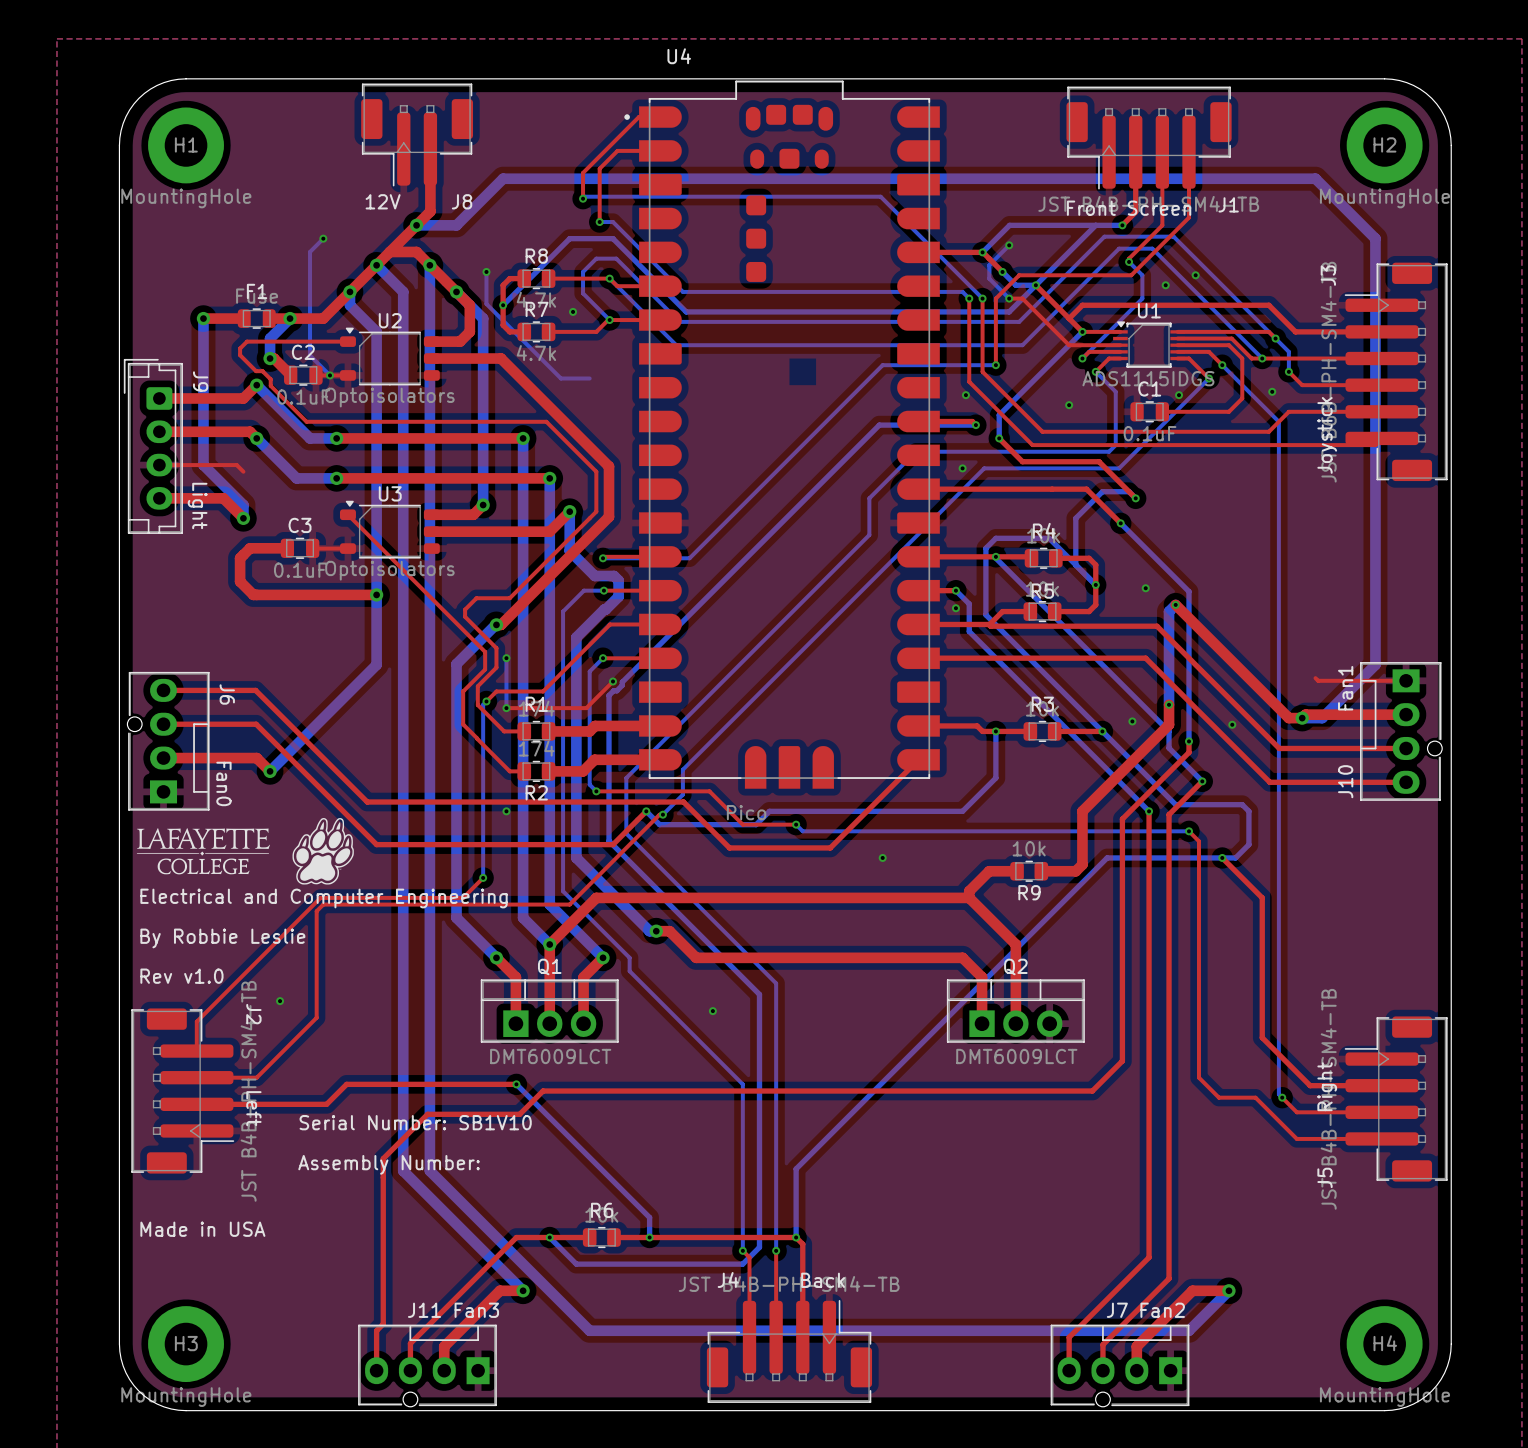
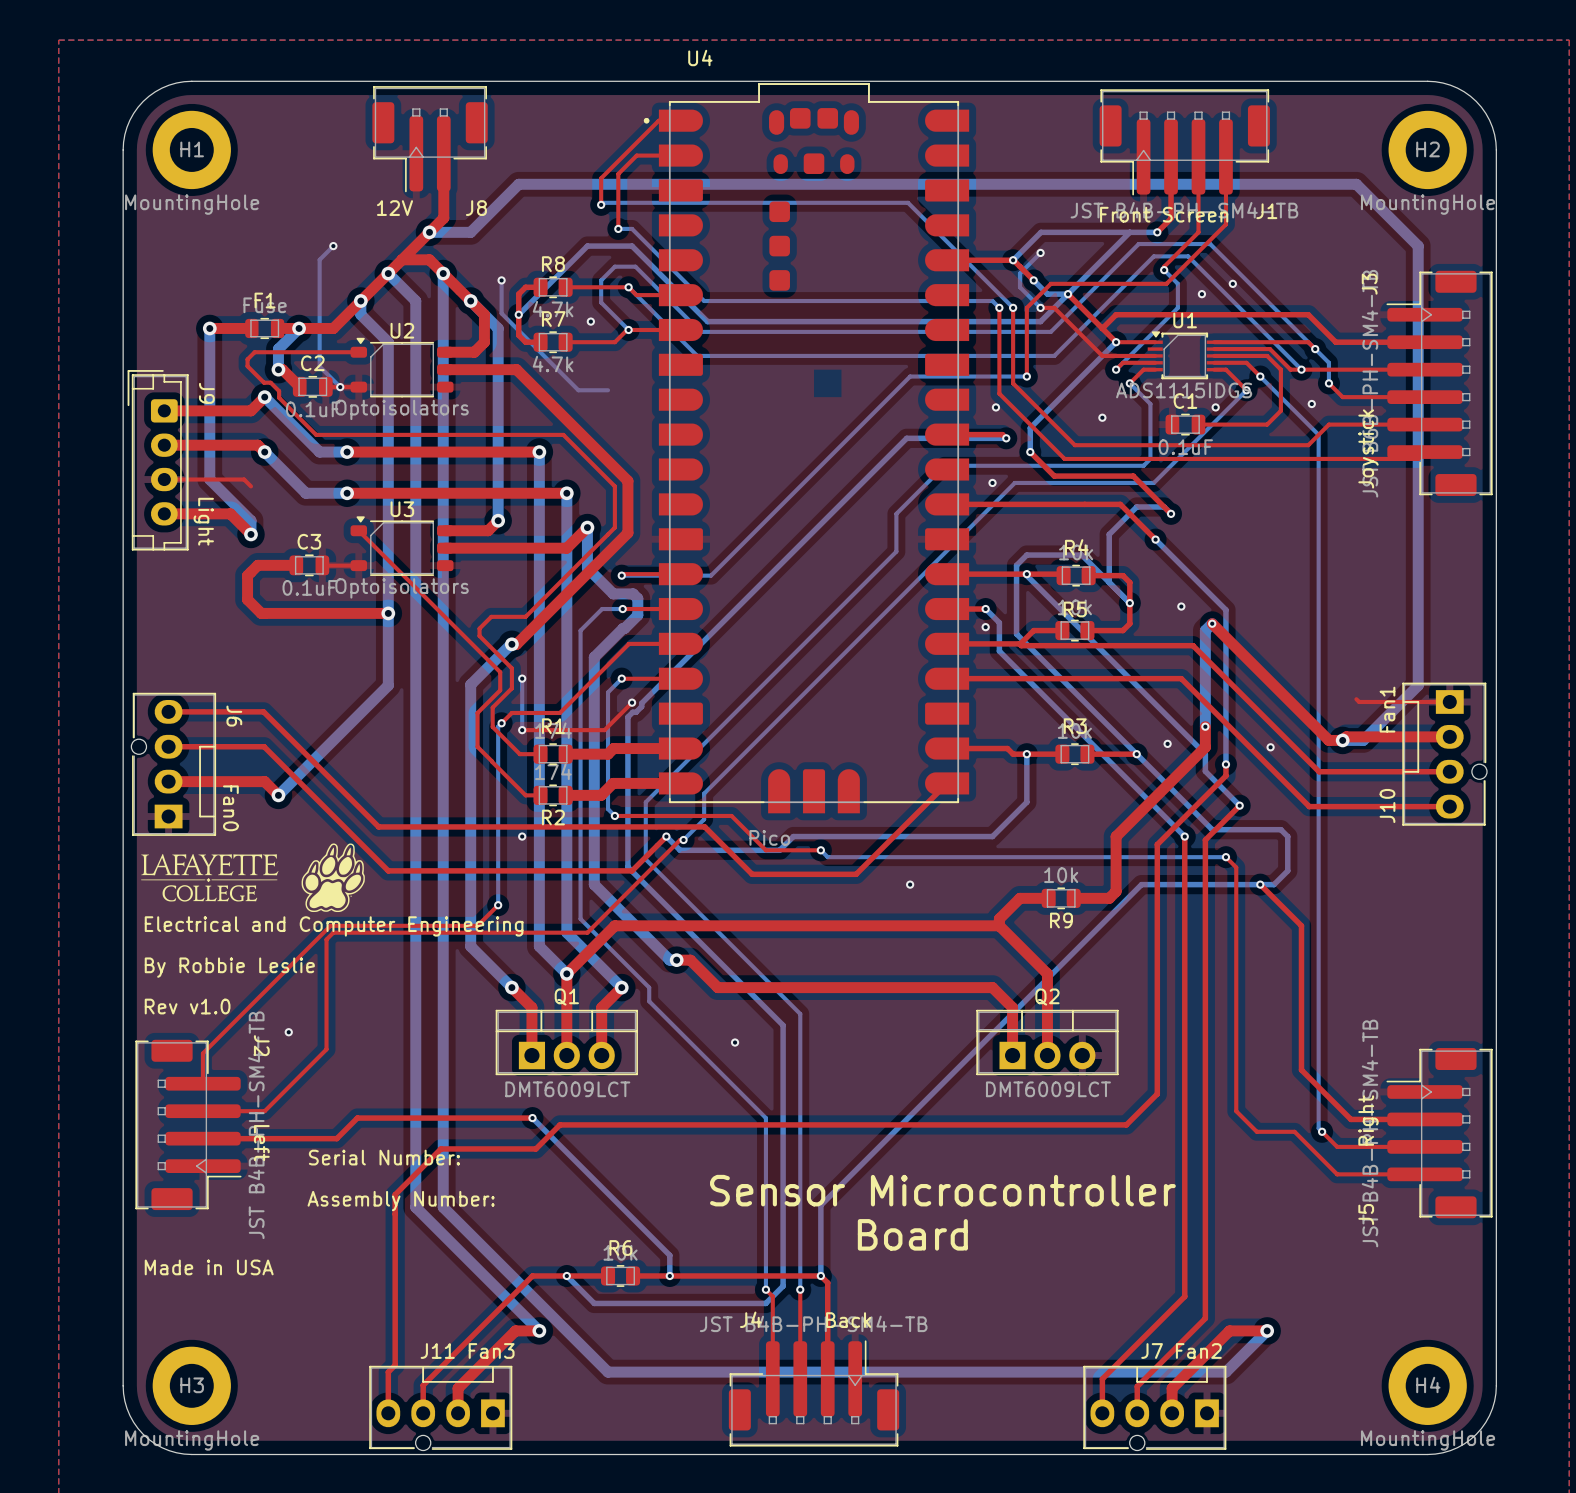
text: Serial Number: SB1V10 (415, 1122) -> Serial Number: (384, 1157)
text: none -> Sensor Microcontroller (942, 1190)
text: none -> Board (912, 1234)

